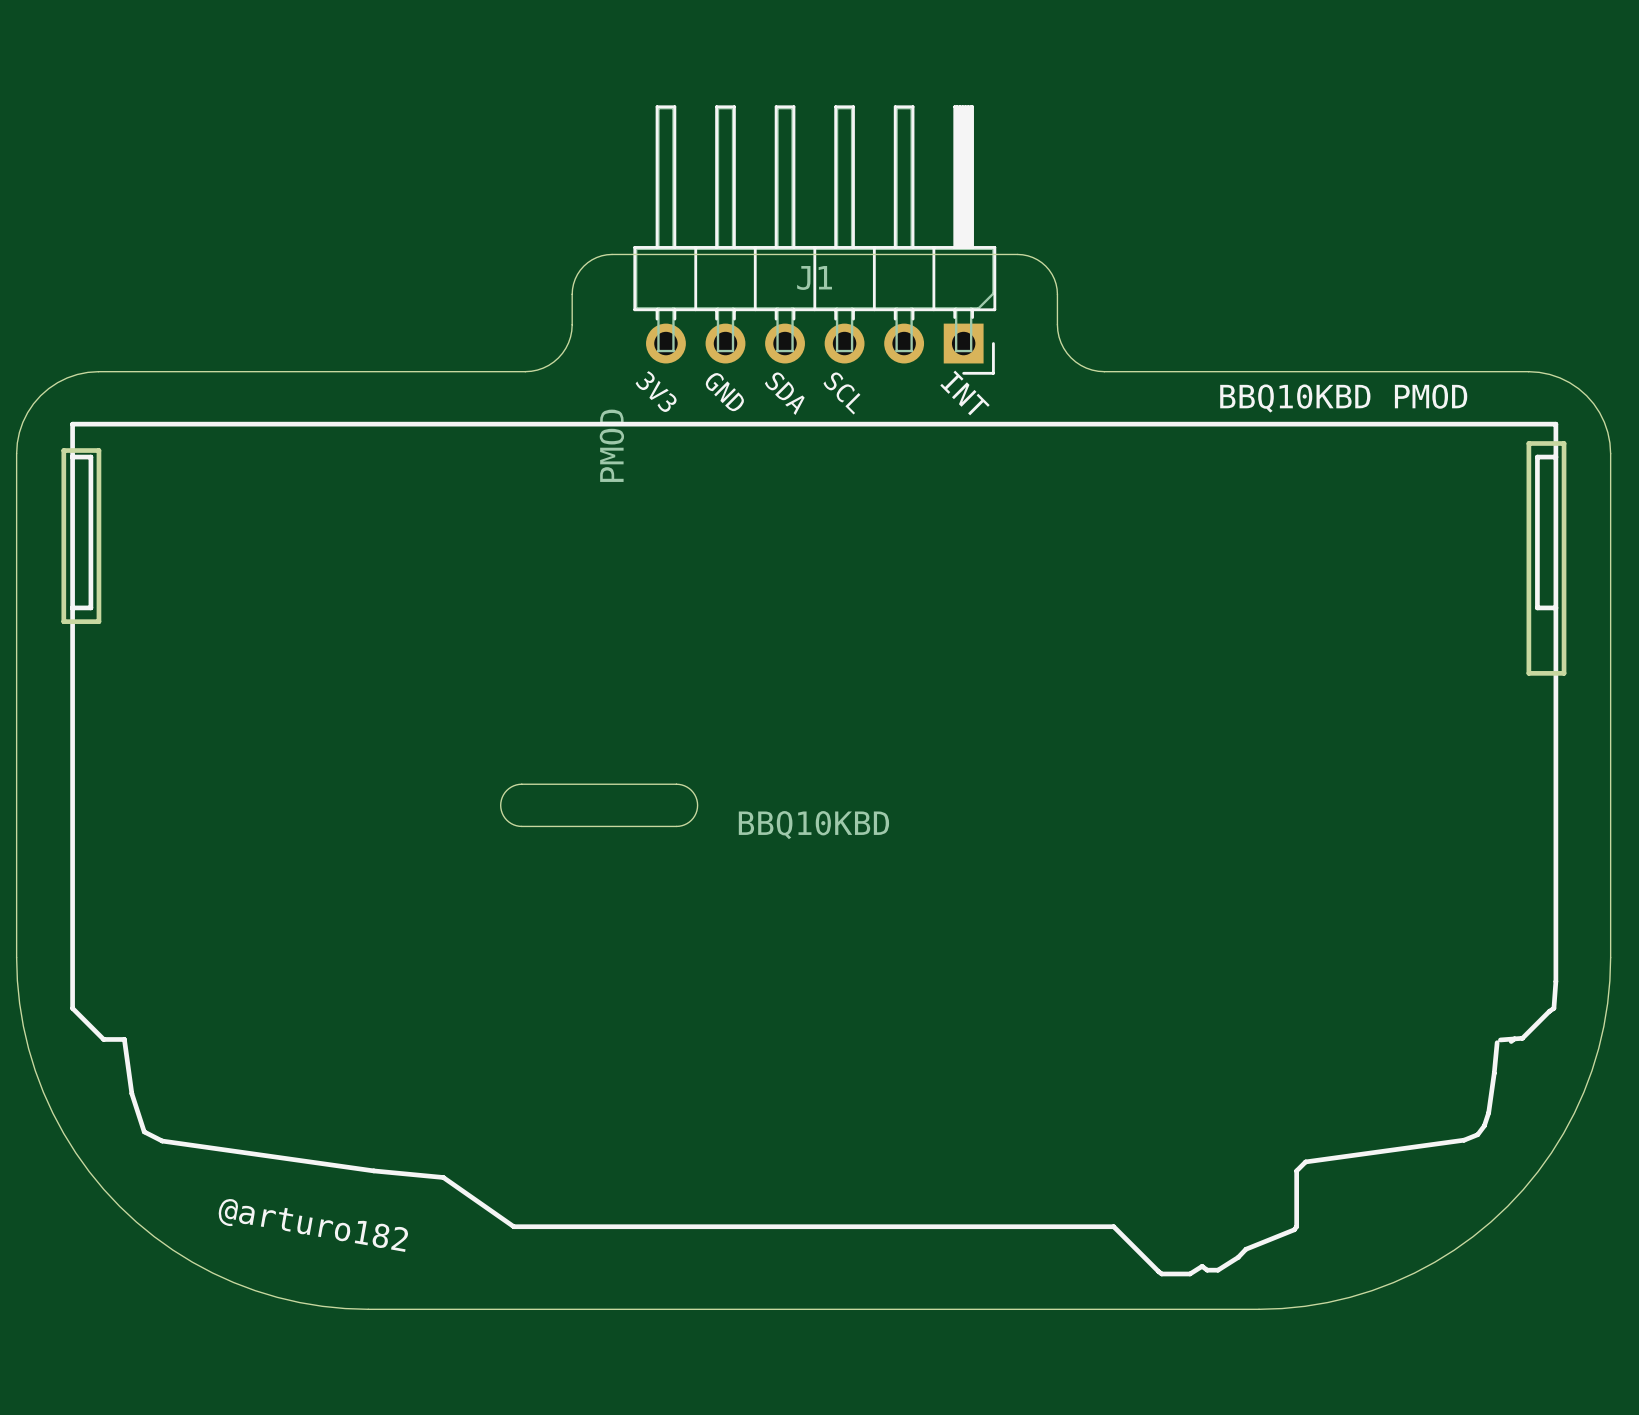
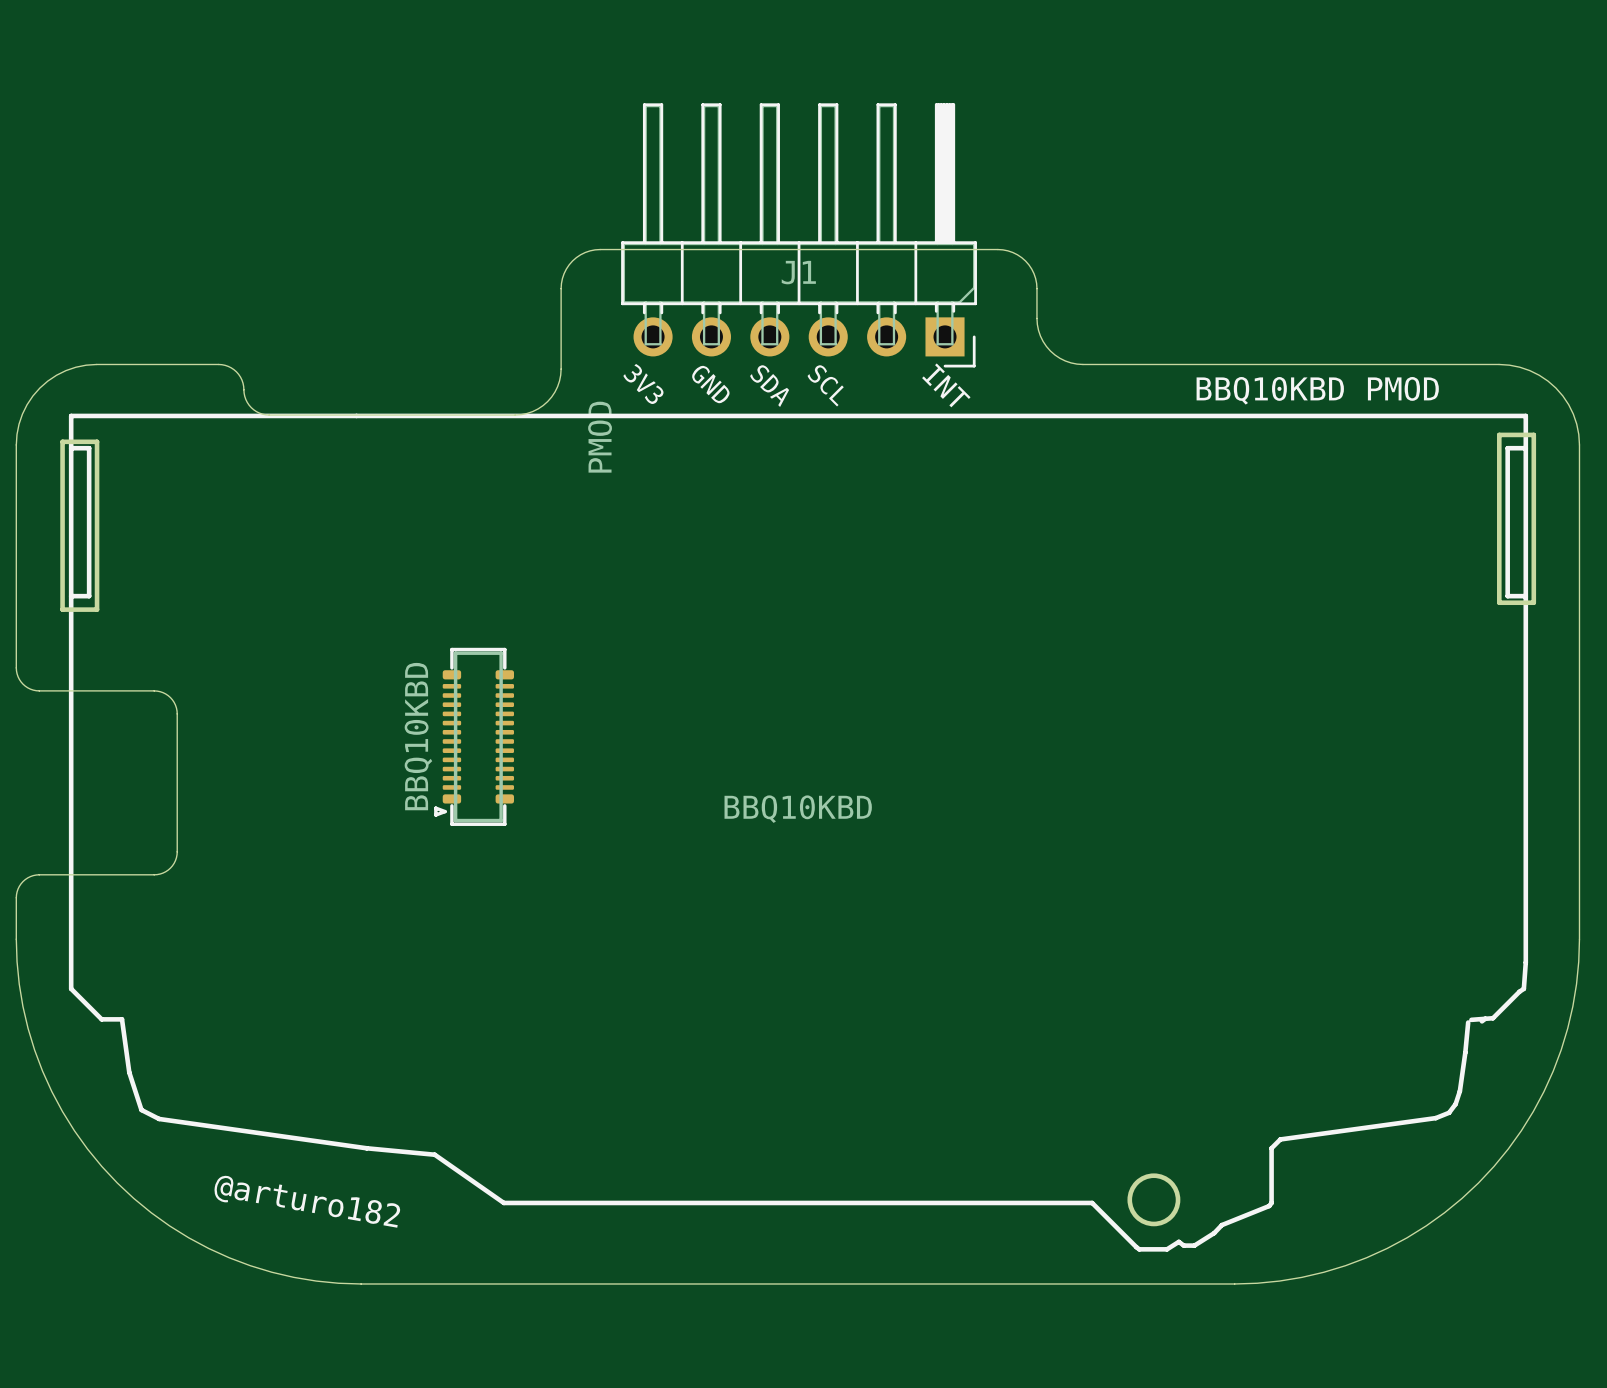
board edge: (572, 324) (568, 342) (558, 357) (548, 365) (531, 371) (222, 371) -> (561, 318) (561, 369) (557, 386) (551, 397) (543, 405) (532, 411) (521, 414) (265, 414) (256, 411) (249, 405) (244, 396) (241, 380) (236, 371) (228, 366) (218, 364)
drawing shape: [61, 421, 1567, 1277] -> [60, 413, 1537, 1252]
board edge: (16, 681) (16, 915) -> (16, 667) (21, 681) (33, 690) (157, 691) (170, 697) (175, 705) (177, 713) (177, 851) (172, 865) (165, 871) (157, 874) (33, 875) (21, 883) (16, 897)
part: none -> BBQ10KBD (474, 736)
board edge: (521, 784) (679, 784) (687, 787) (693, 792) (696, 799) (697, 808) (691, 820) (679, 826) (519, 826) (506, 820) (502, 813) (500, 805) (502, 797) (506, 790) (513, 785) (521, 784) -> none

